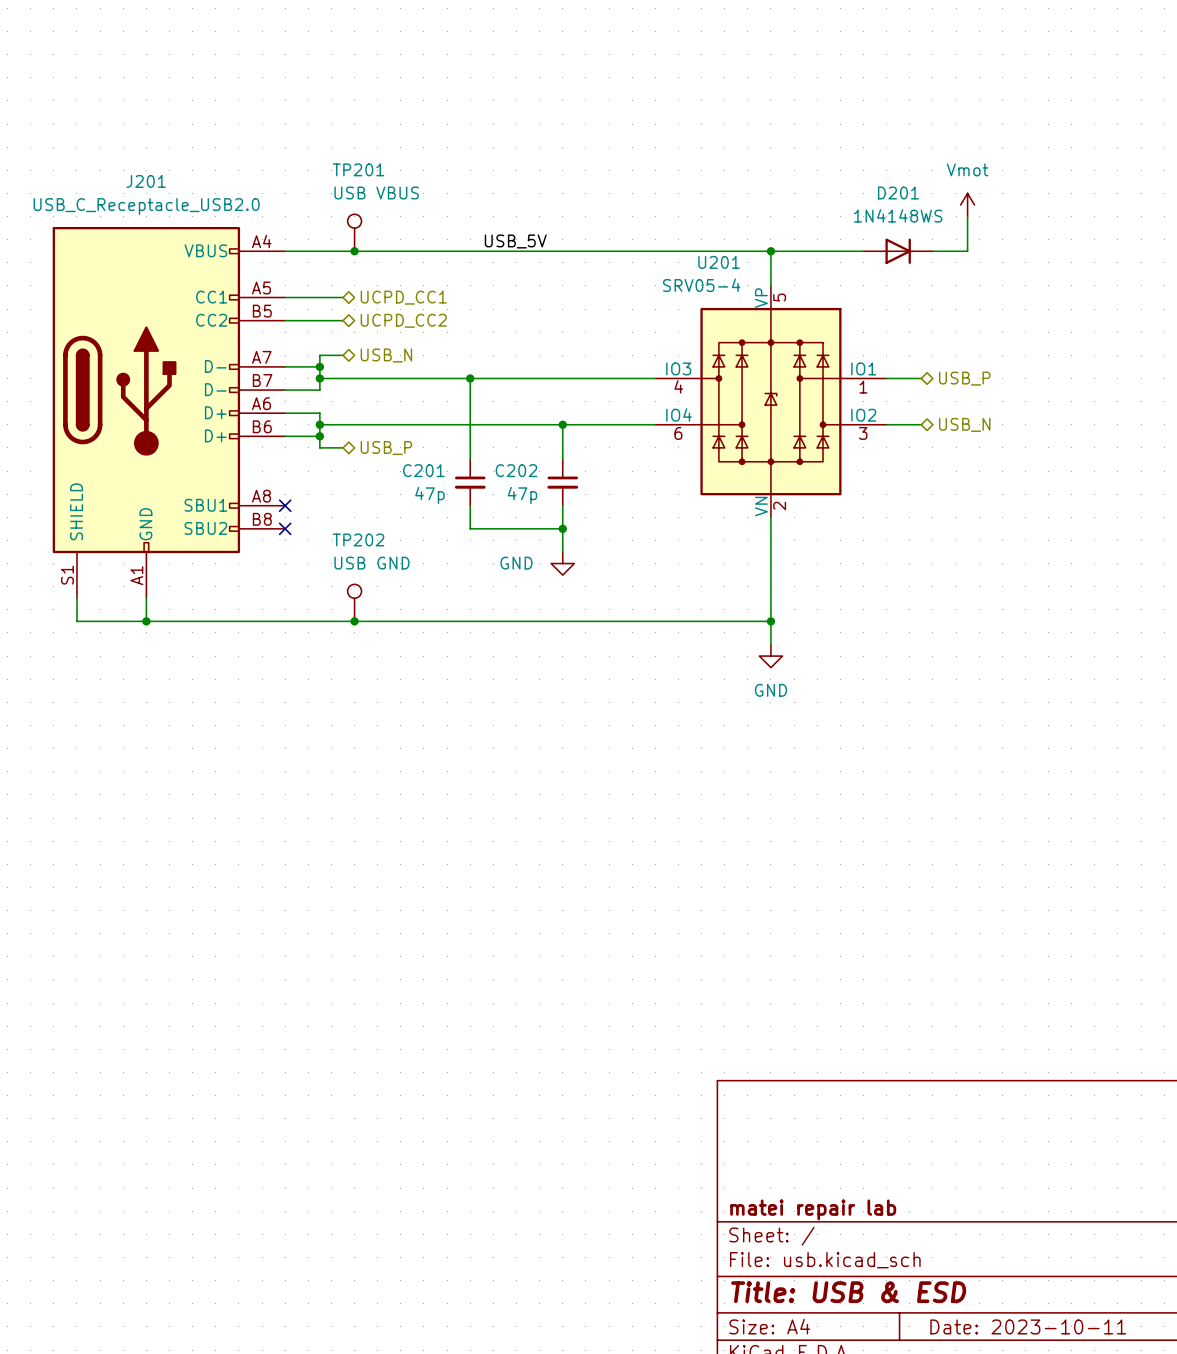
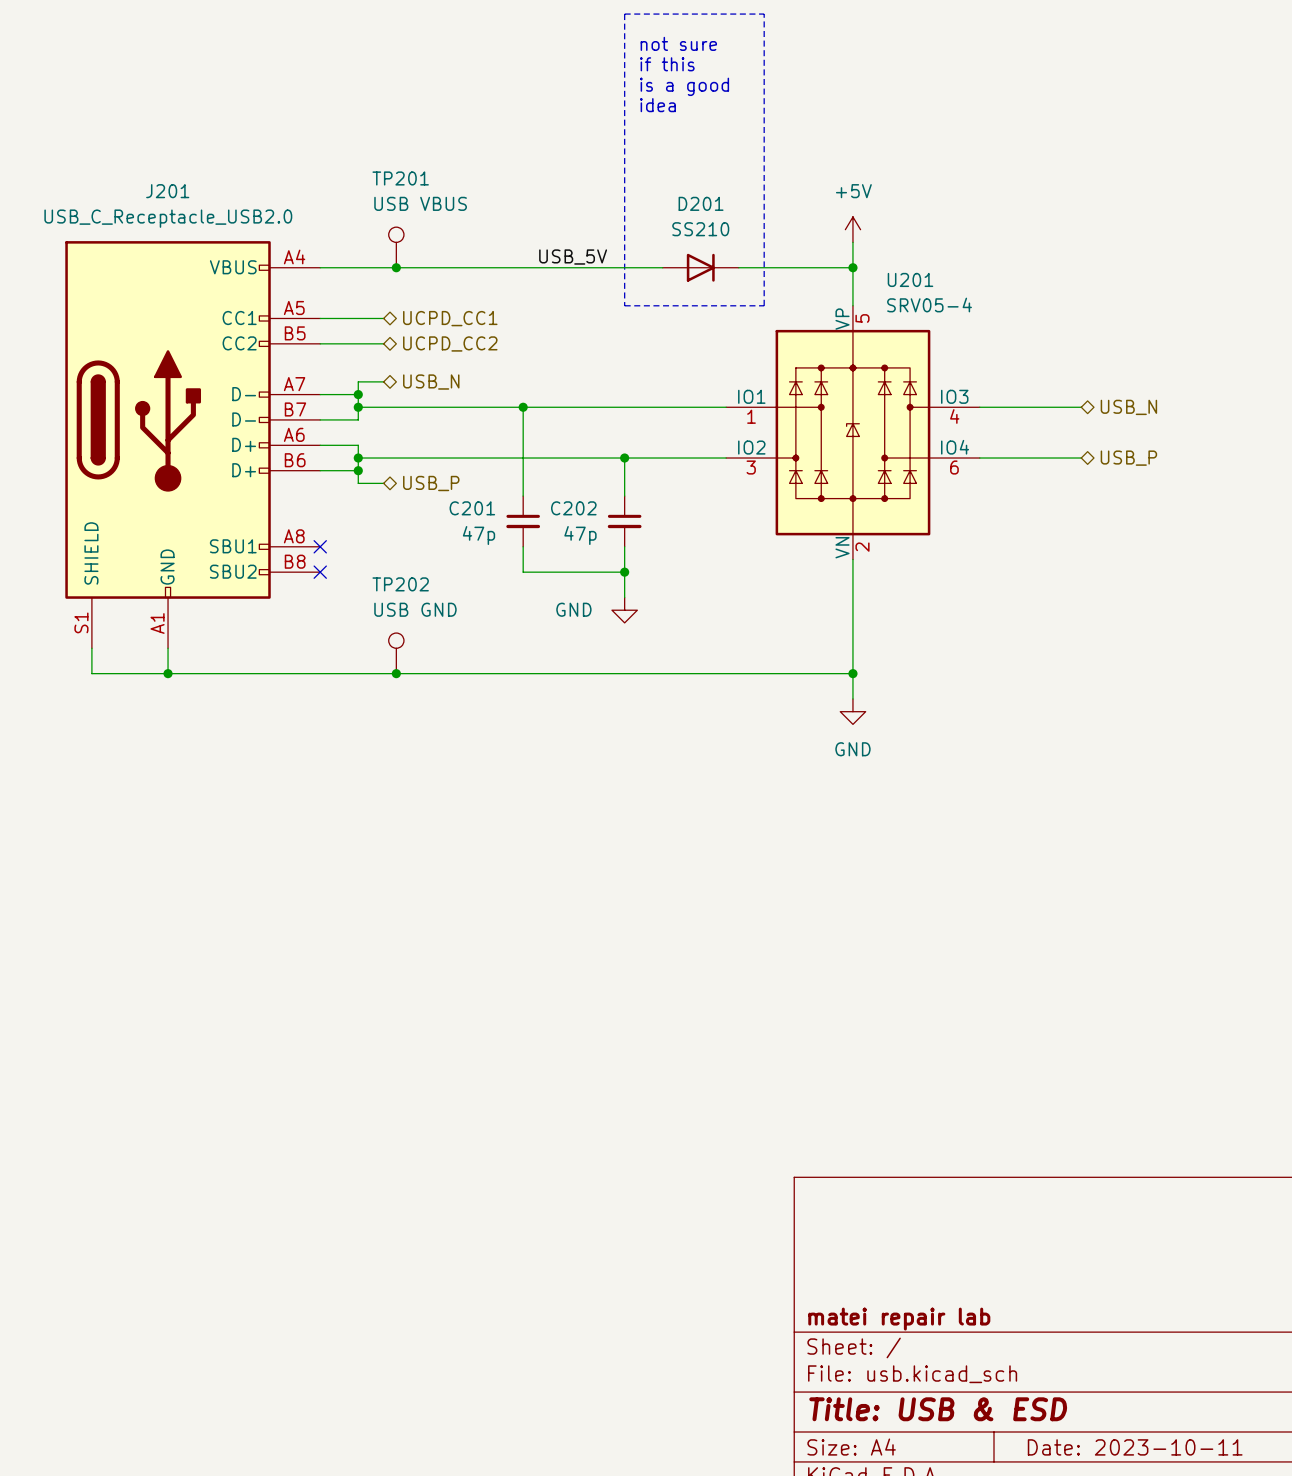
line: none -> (624, 14) (624, 305) (764, 305) (764, 14) (624, 14)
text: none -> not sure (678, 43)
text: none -> if this (667, 64)
text: none -> is a good (684, 86)
text: none -> idea (657, 105)
power symbol: Vmot (967, 204) -> none
D201 value: 1N4148WS (898, 215) -> SS210 (700, 229)
power symbol: none -> +5V (852, 229)
wire: (967, 216) (967, 251) (932, 251) -> none
wire: (770, 251) (863, 251) -> (852, 267) (852, 242)
D201 position: (898, 251) -> (700, 267)
wire: none -> (1017, 407) (1081, 407)
hierarchical label position: USB_P (964, 378) -> USB_P (1128, 458)
U201 flip: as is (770, 401) -> left-right (852, 432)
wire: none -> (1017, 458) (1081, 458)
hierarchical label position: USB_N (964, 424) -> USB_N (1128, 407)

